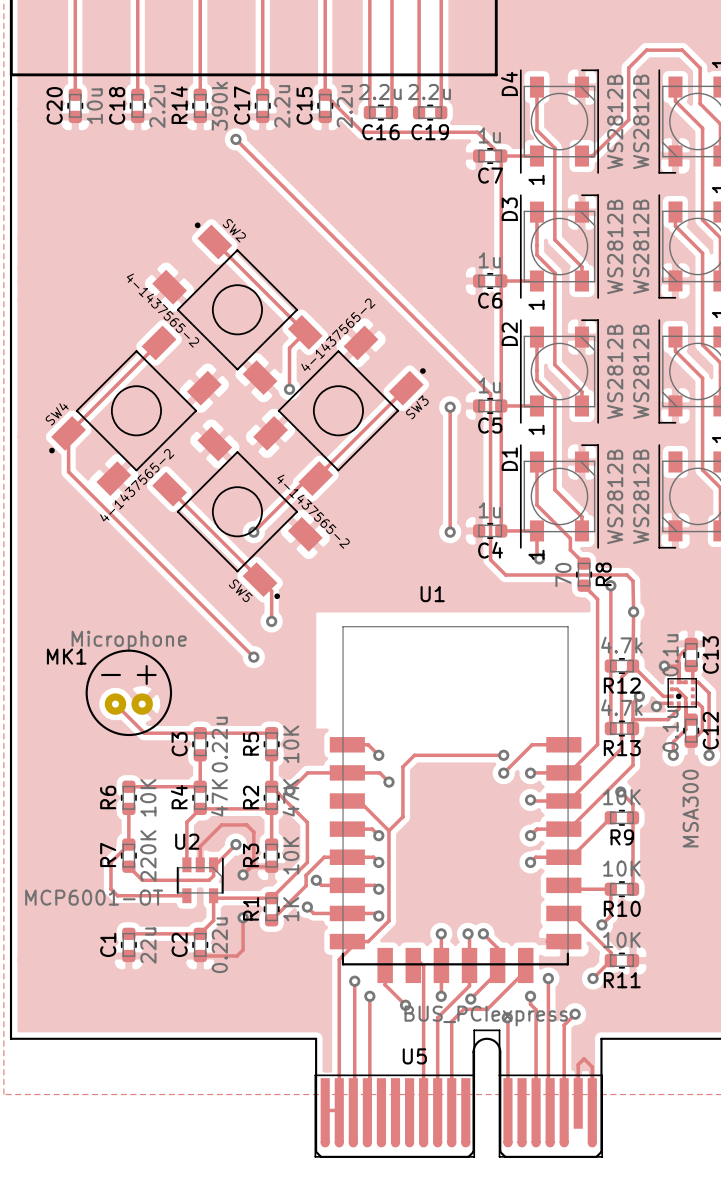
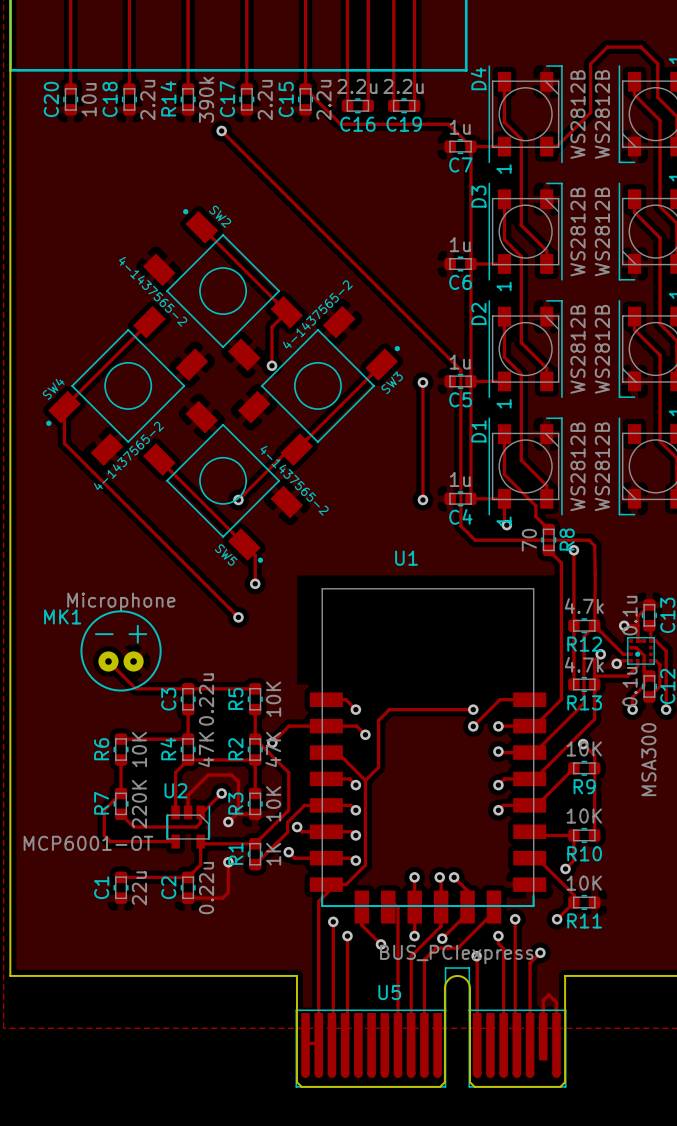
via: (633, 611) -> none

